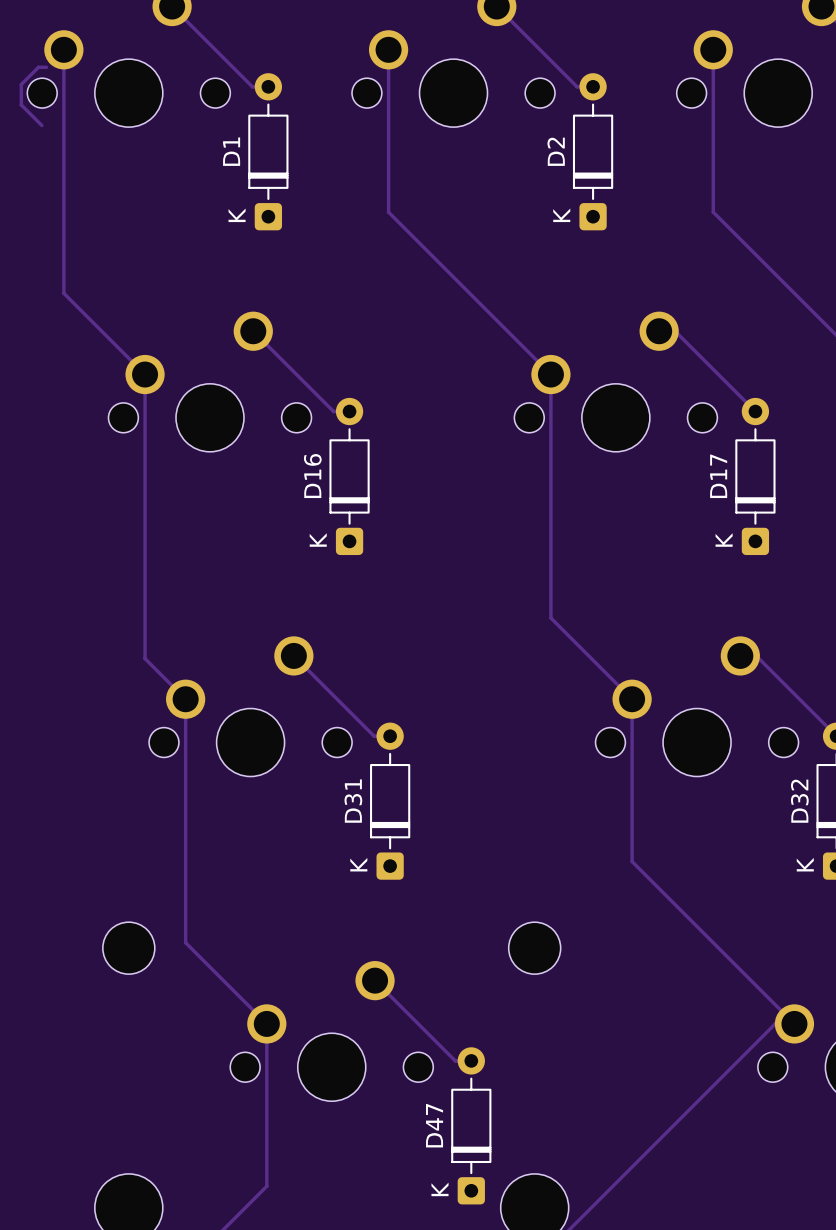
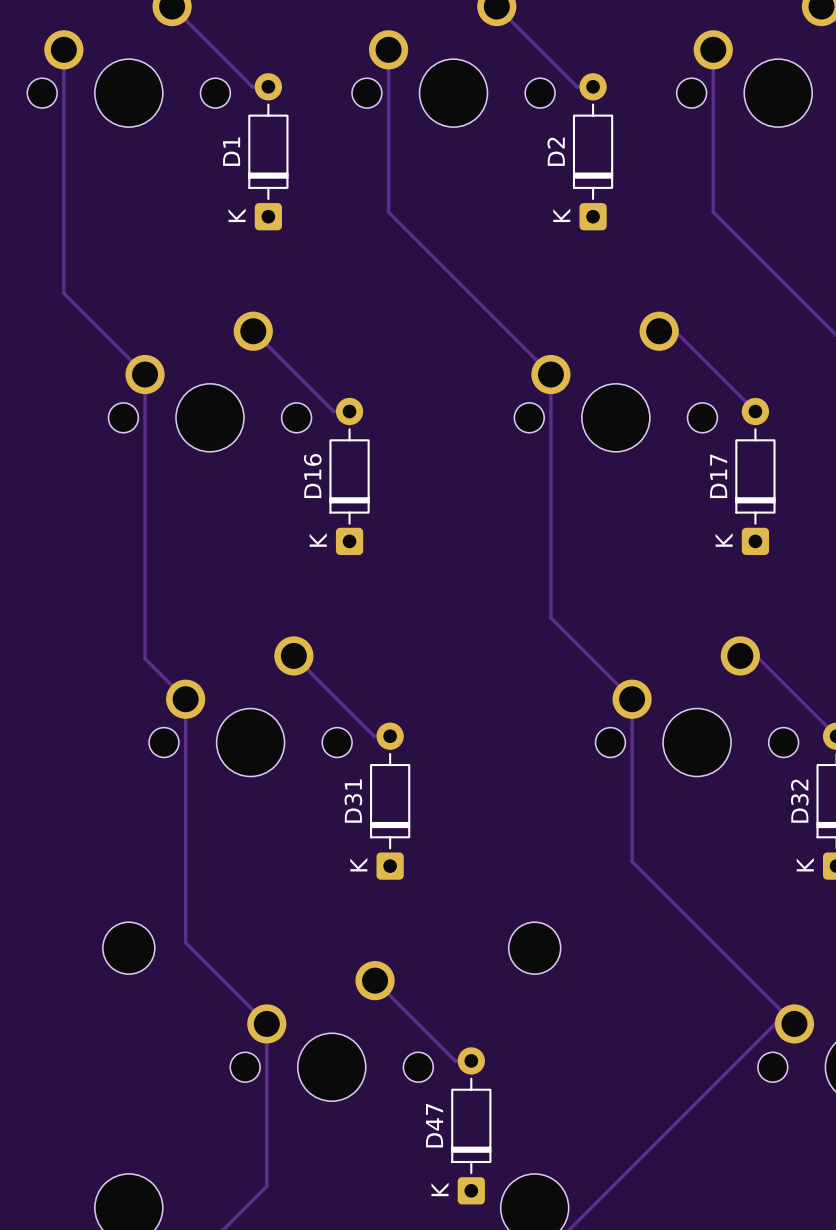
track: (46, 67) (38, 67) (21, 84) (21, 104) (41, 125) -> none

